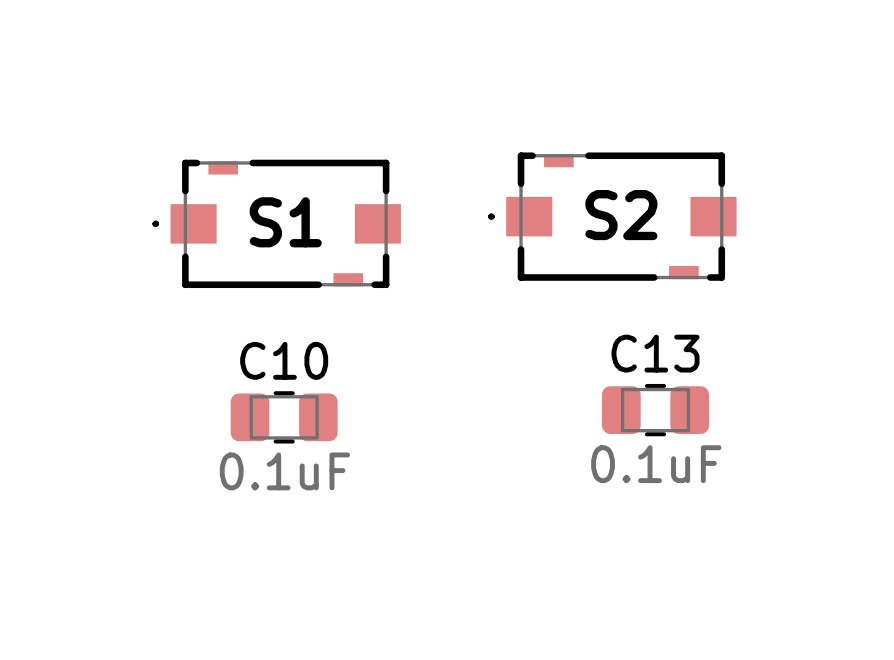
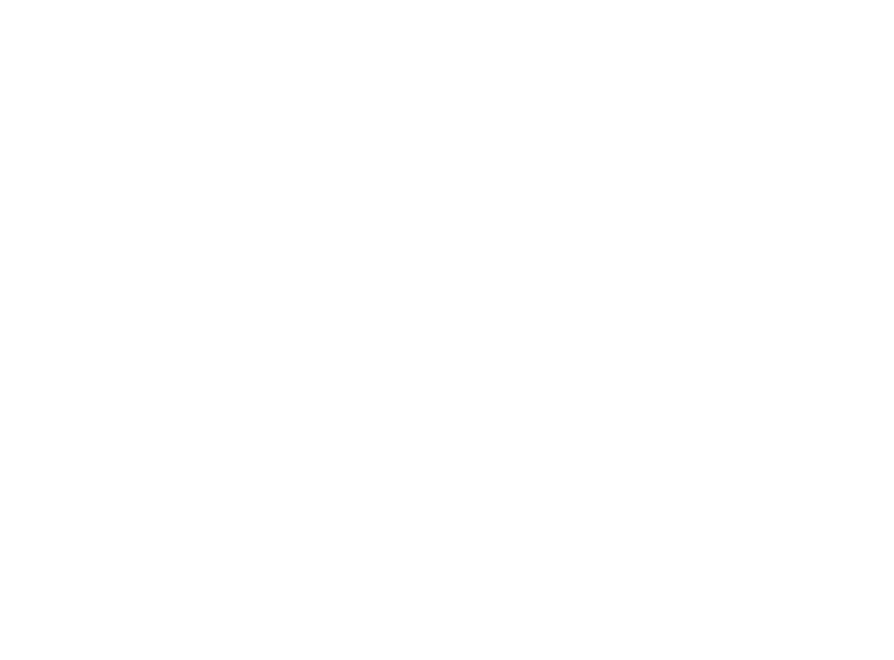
S2: (612, 216) -> none
S1: (276, 223) -> none
C13: 0.1uF (655, 410) -> none
C10: 0.1uF (284, 417) -> none

